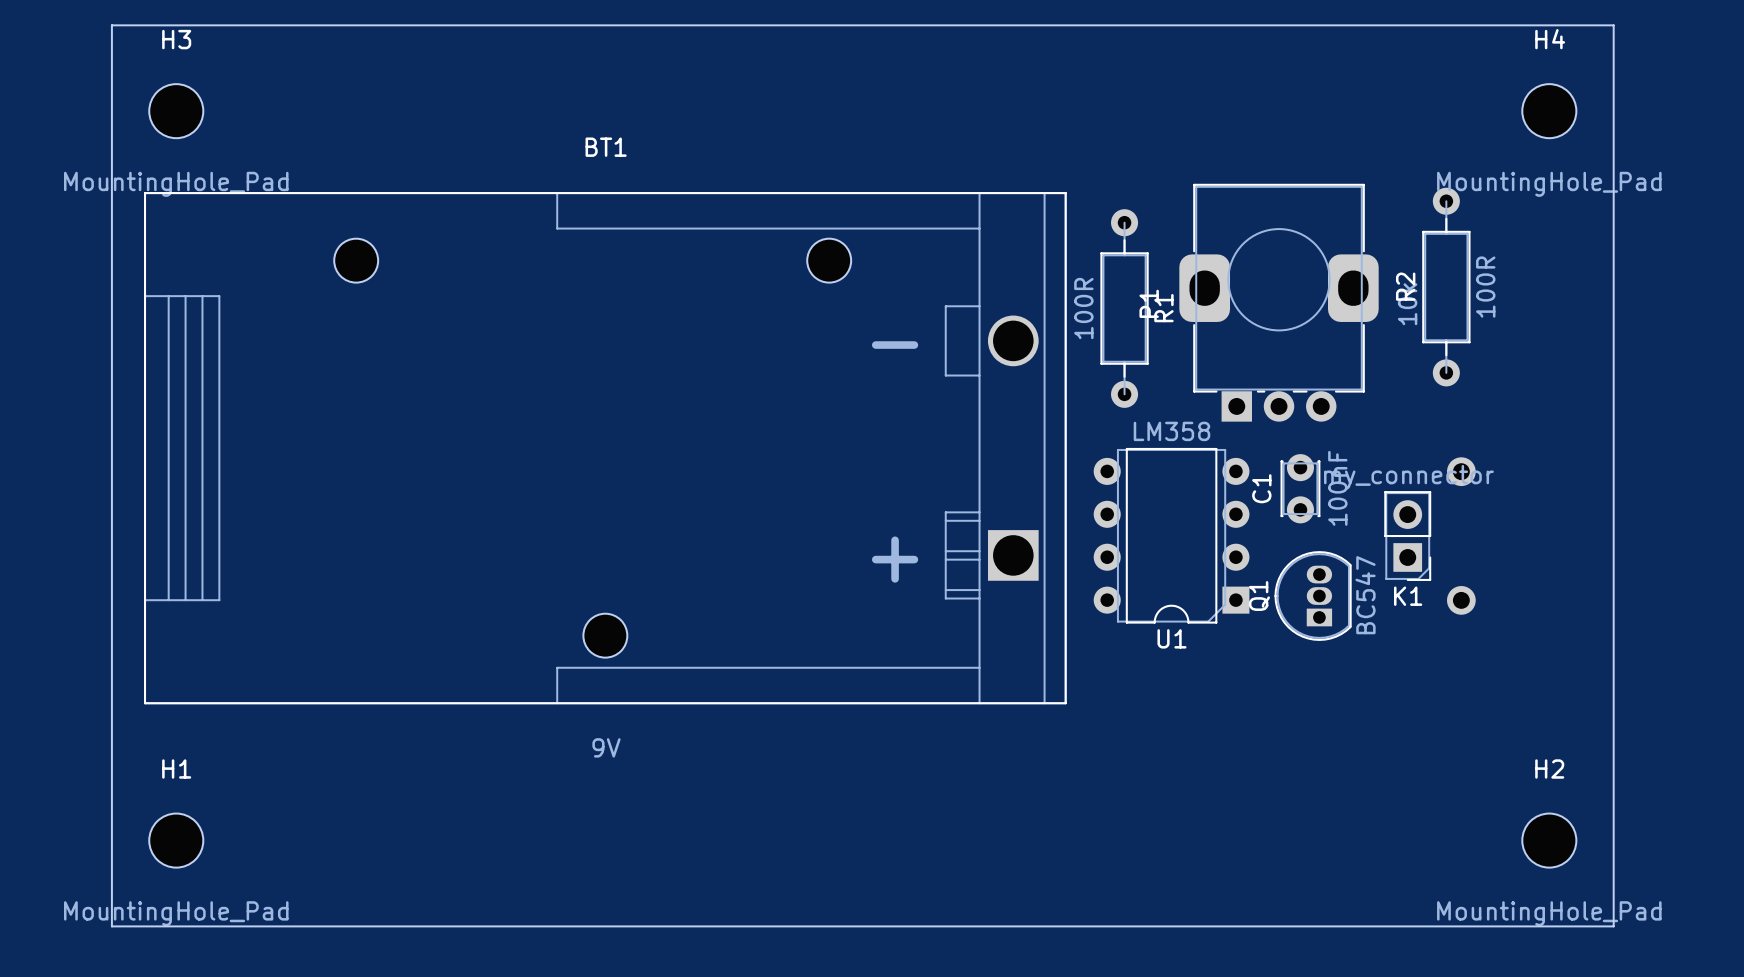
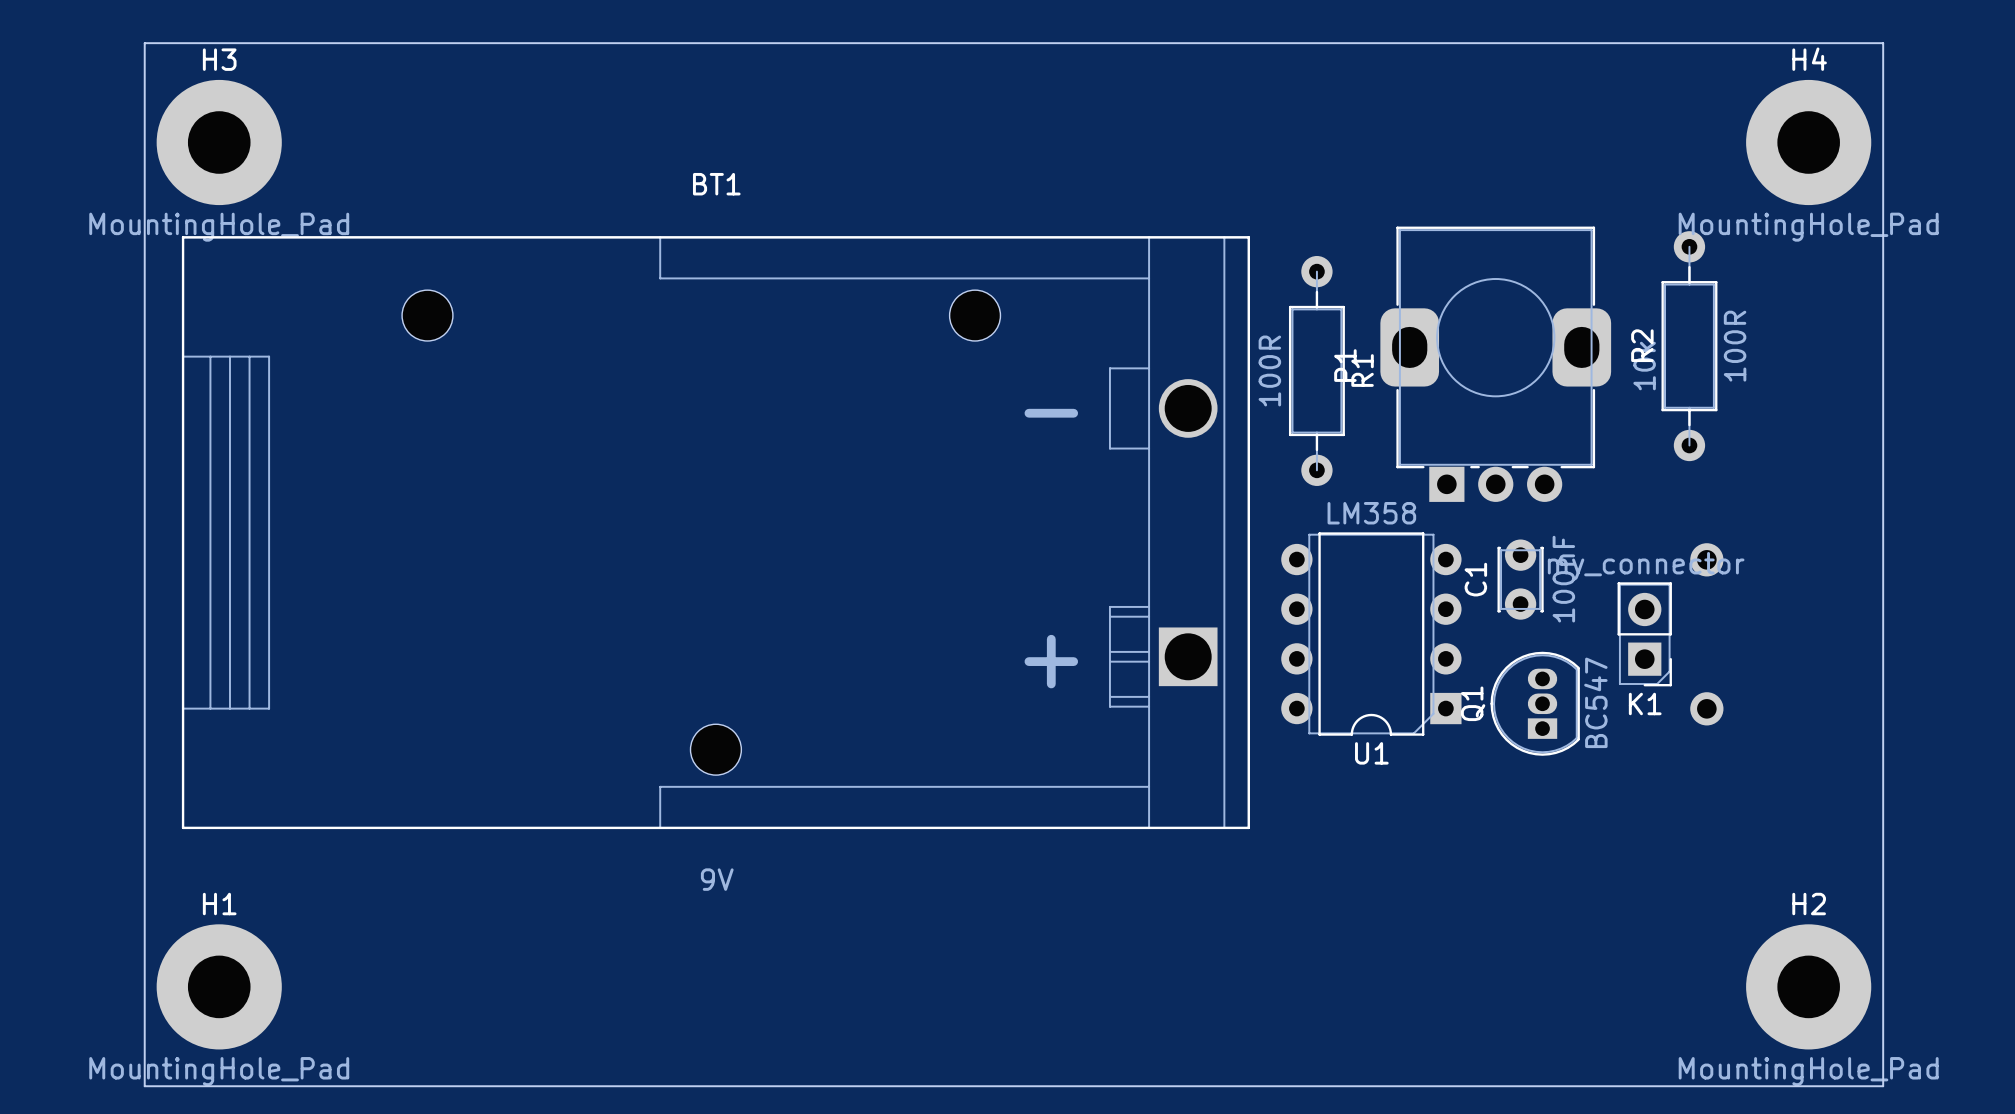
H3 footprint: [149, 84, 204, 139] -> [156, 79, 282, 206]
H4 footprint: [1522, 84, 1577, 139] -> [1746, 79, 1872, 206]
H1 footprint: [149, 813, 204, 868] -> [156, 924, 282, 1050]
H2 footprint: [1522, 813, 1577, 868] -> [1746, 924, 1872, 1050]

